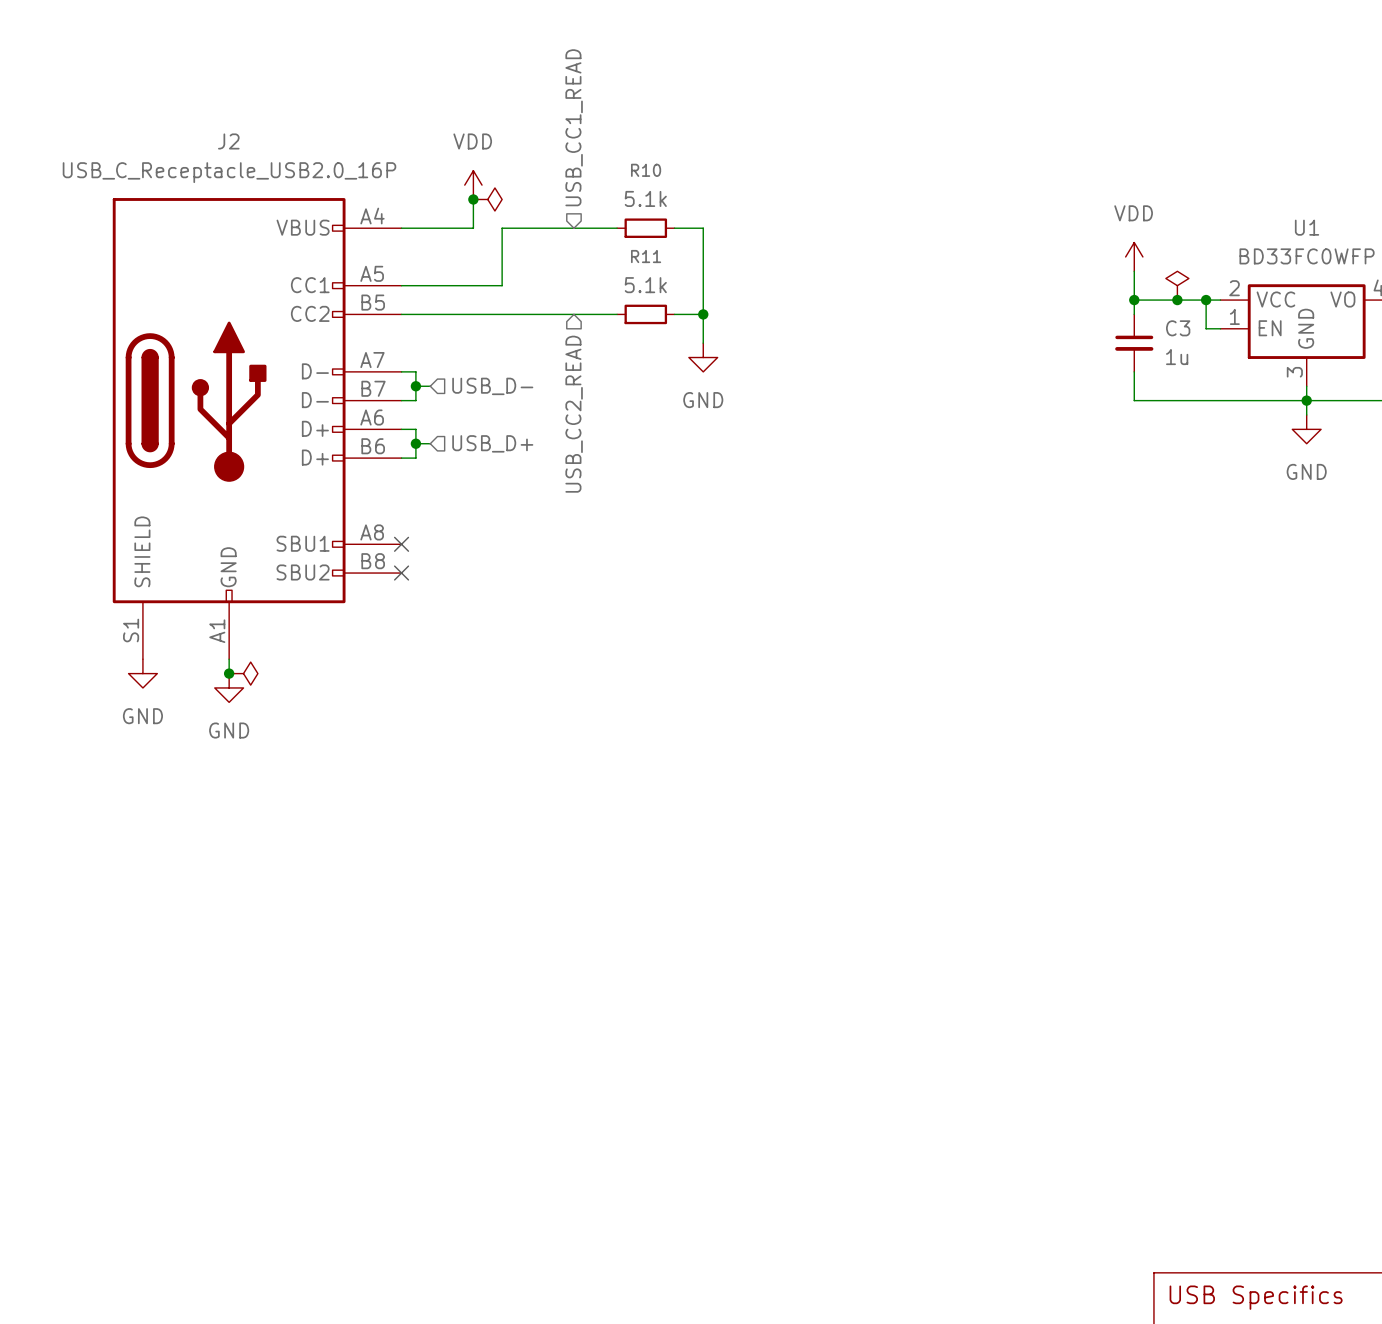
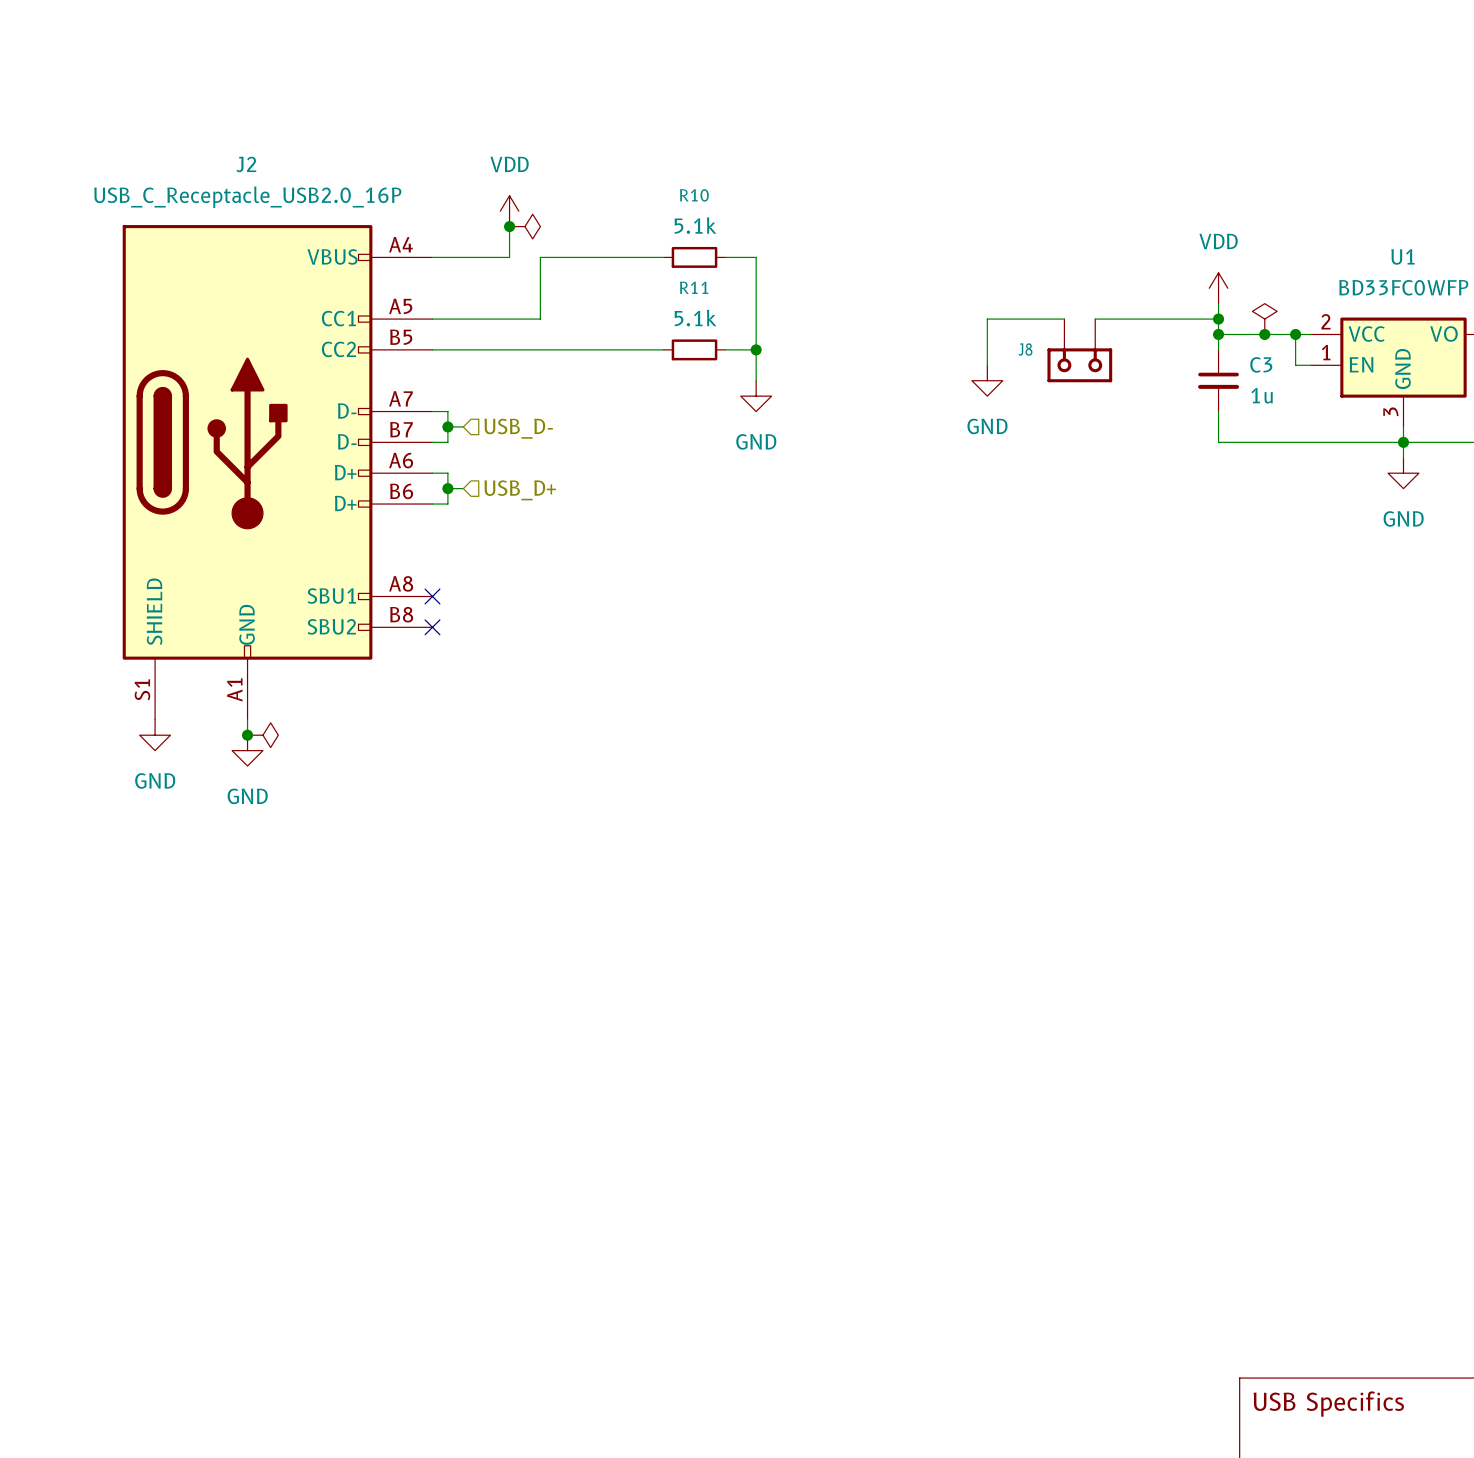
hierarchical label: USB_CC1_READ (574, 127) -> none
wire: none -> (1064, 319) (987, 319) (987, 365)
wire: none -> (1095, 319) (1218, 319)
junction: none -> (1218, 319)
J8: none -> (1079, 350)
power symbol: none -> GND (987, 380)
hierarchical label: USB_CC2_READ (574, 414) -> none

